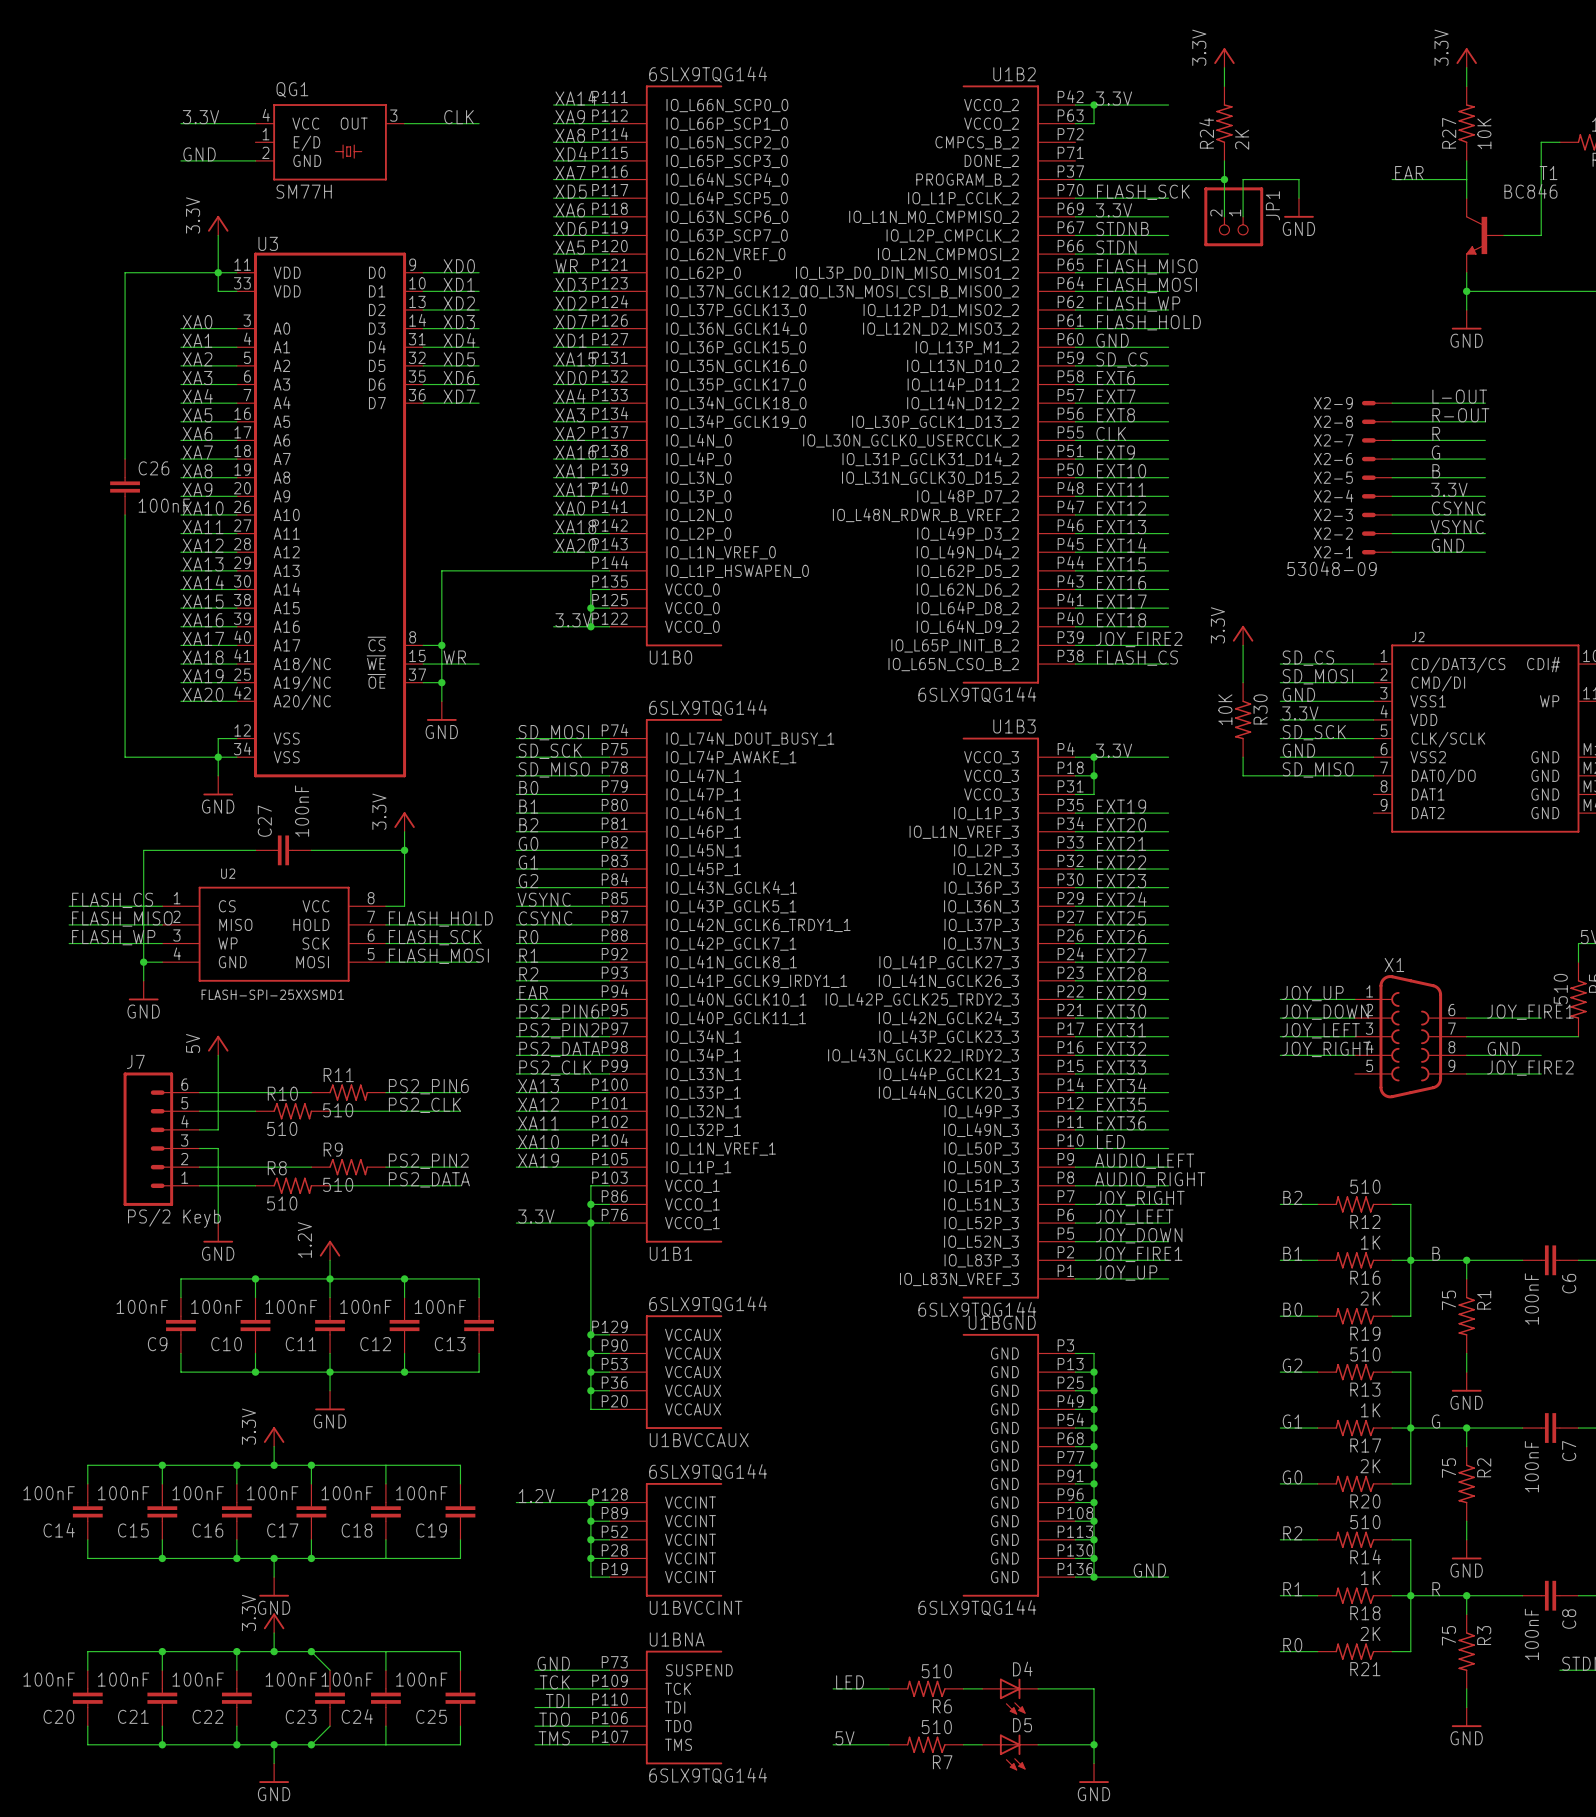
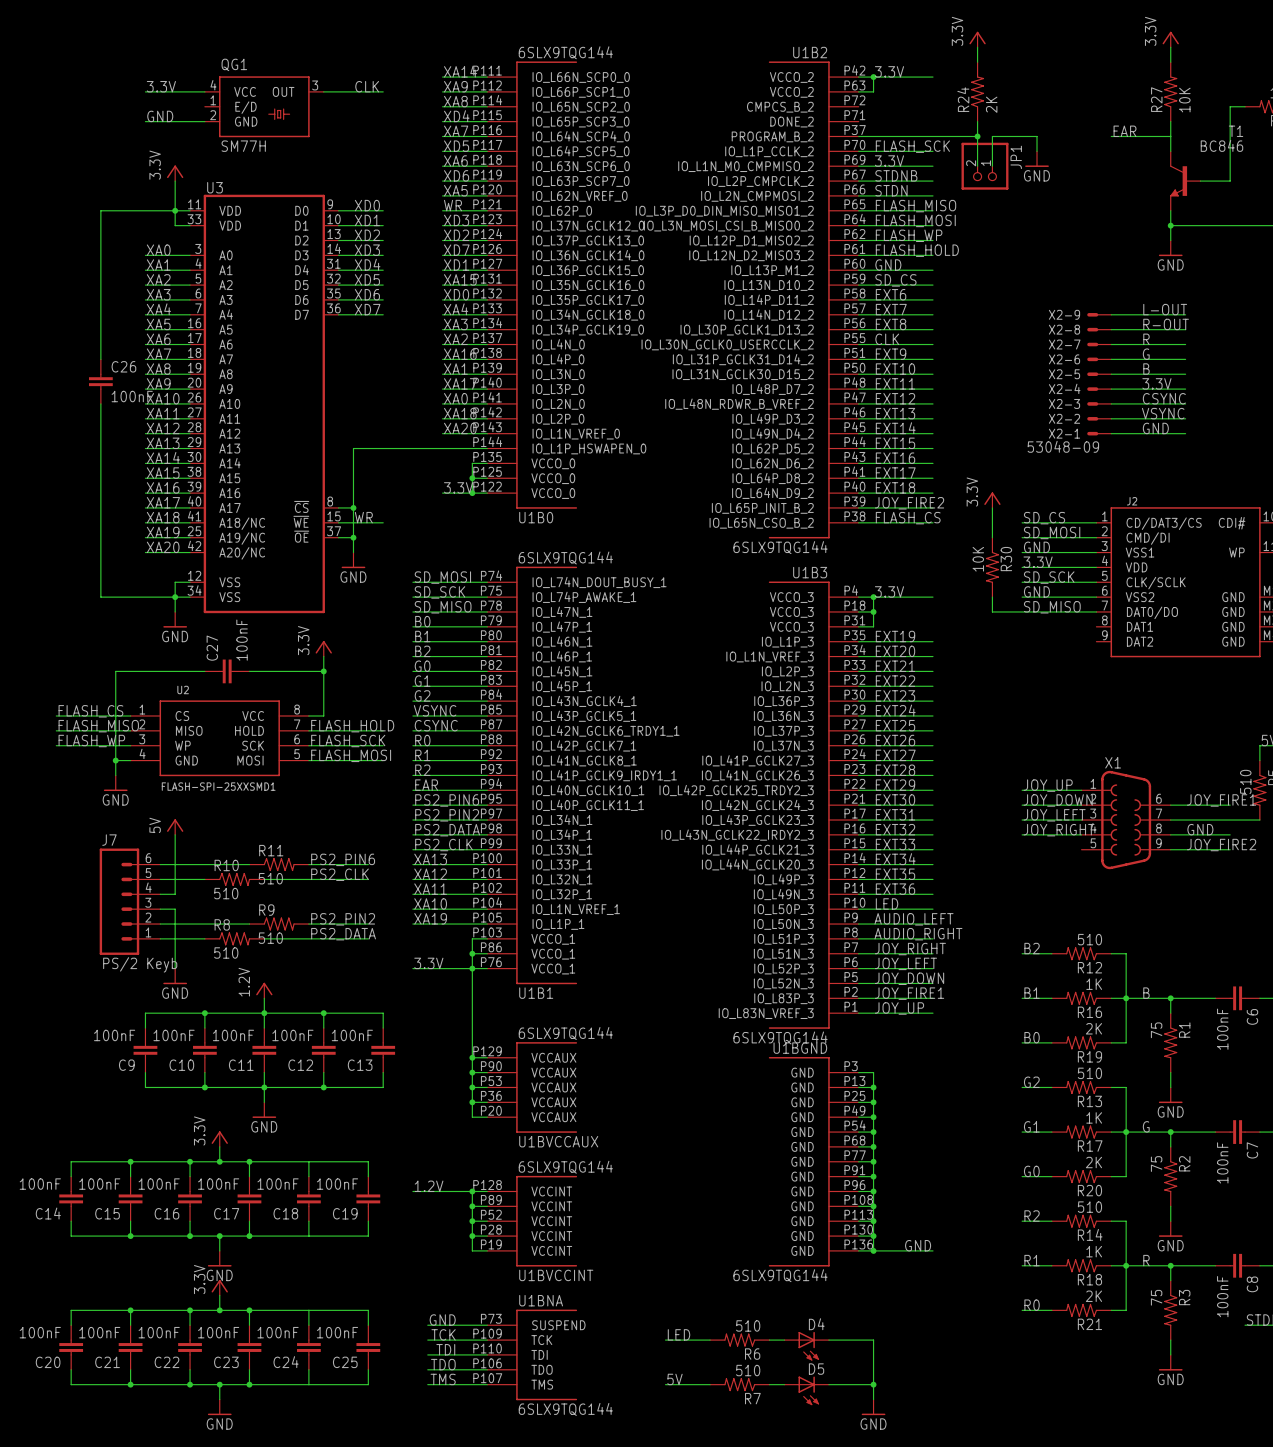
wire: (311, 1651) (330, 1670) -> (249, 1310) (249, 1325)
C23 position: (330, 1698) -> (249, 1347)
wire: (330, 1726) (311, 1744) -> (249, 1369) (249, 1384)

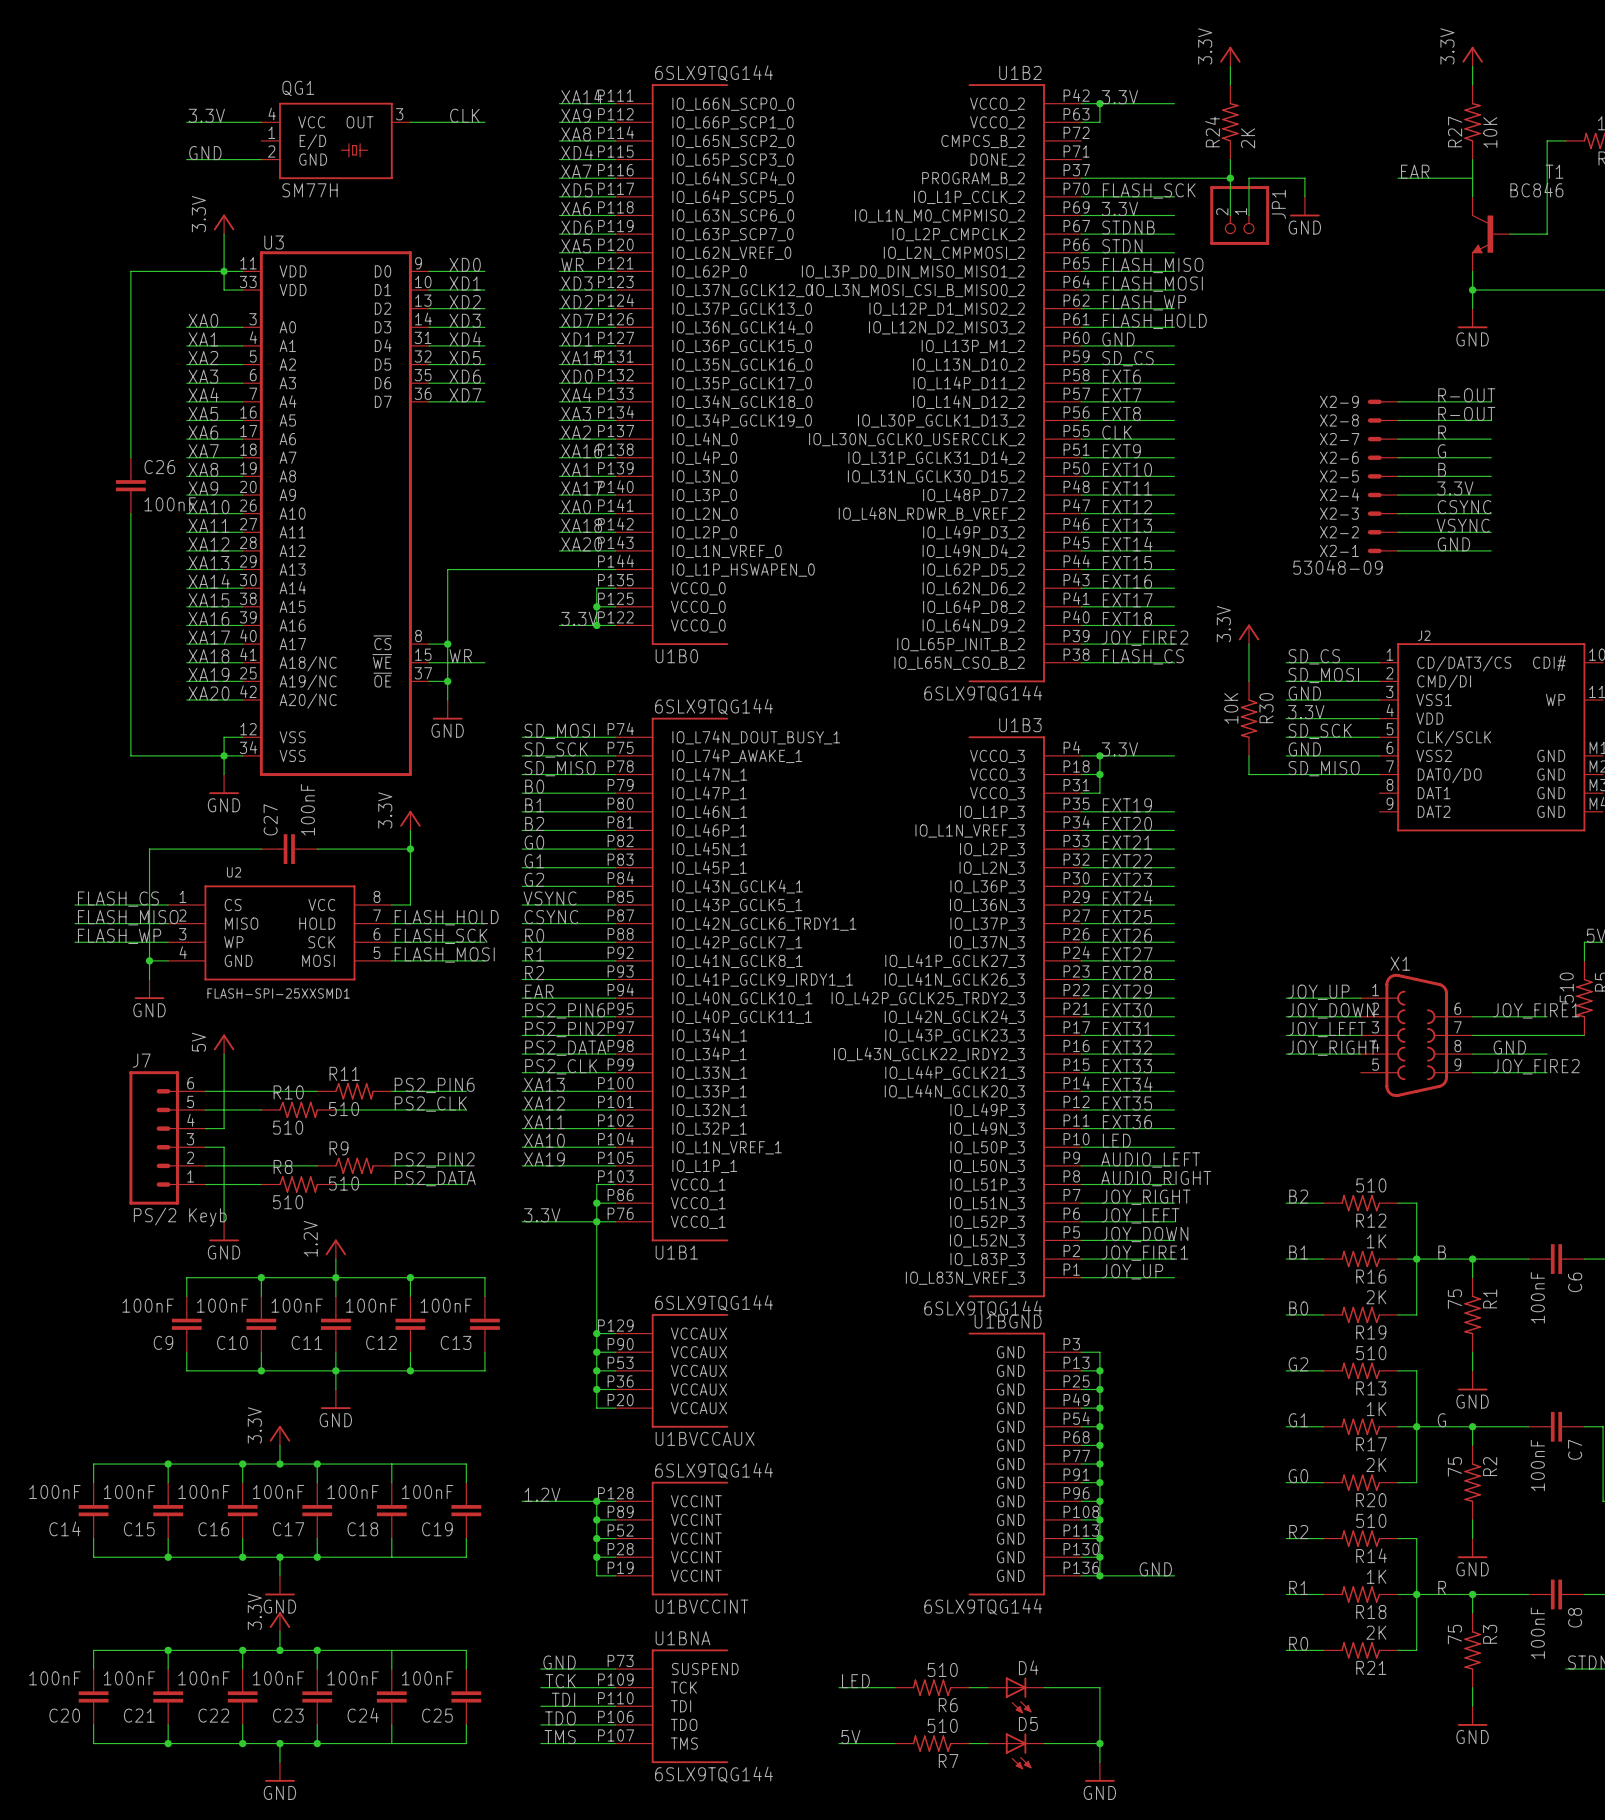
label: L-OUT (1165, 309) -> R-OUT (1466, 395)

